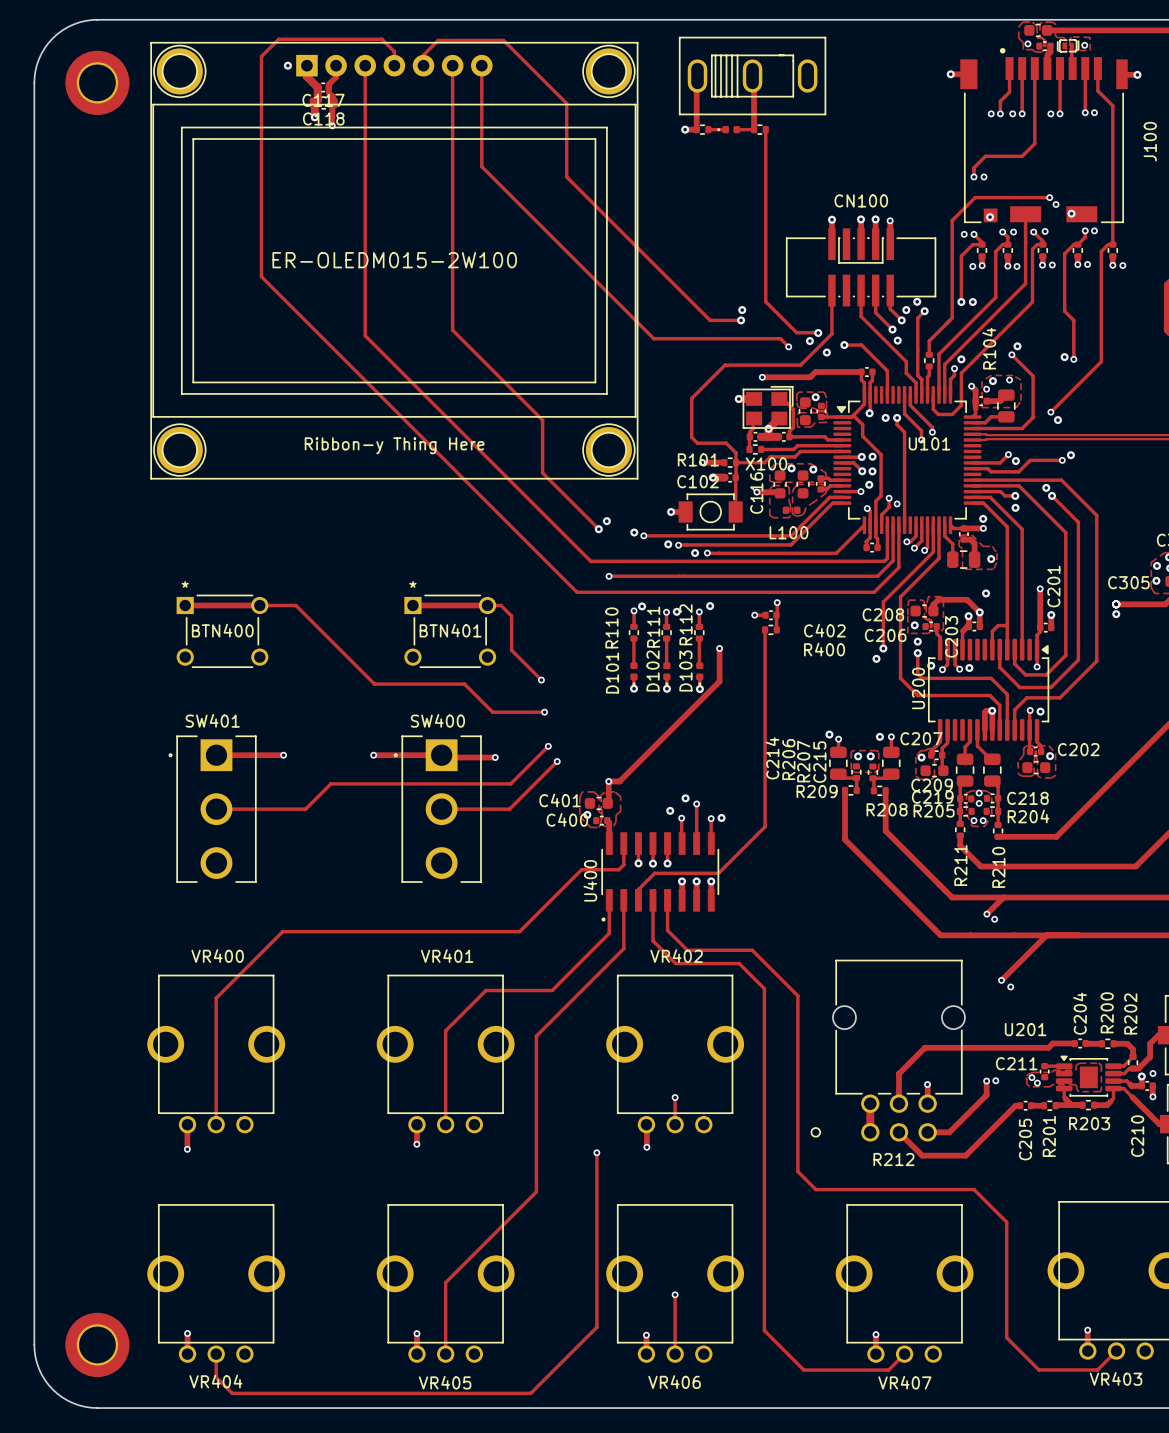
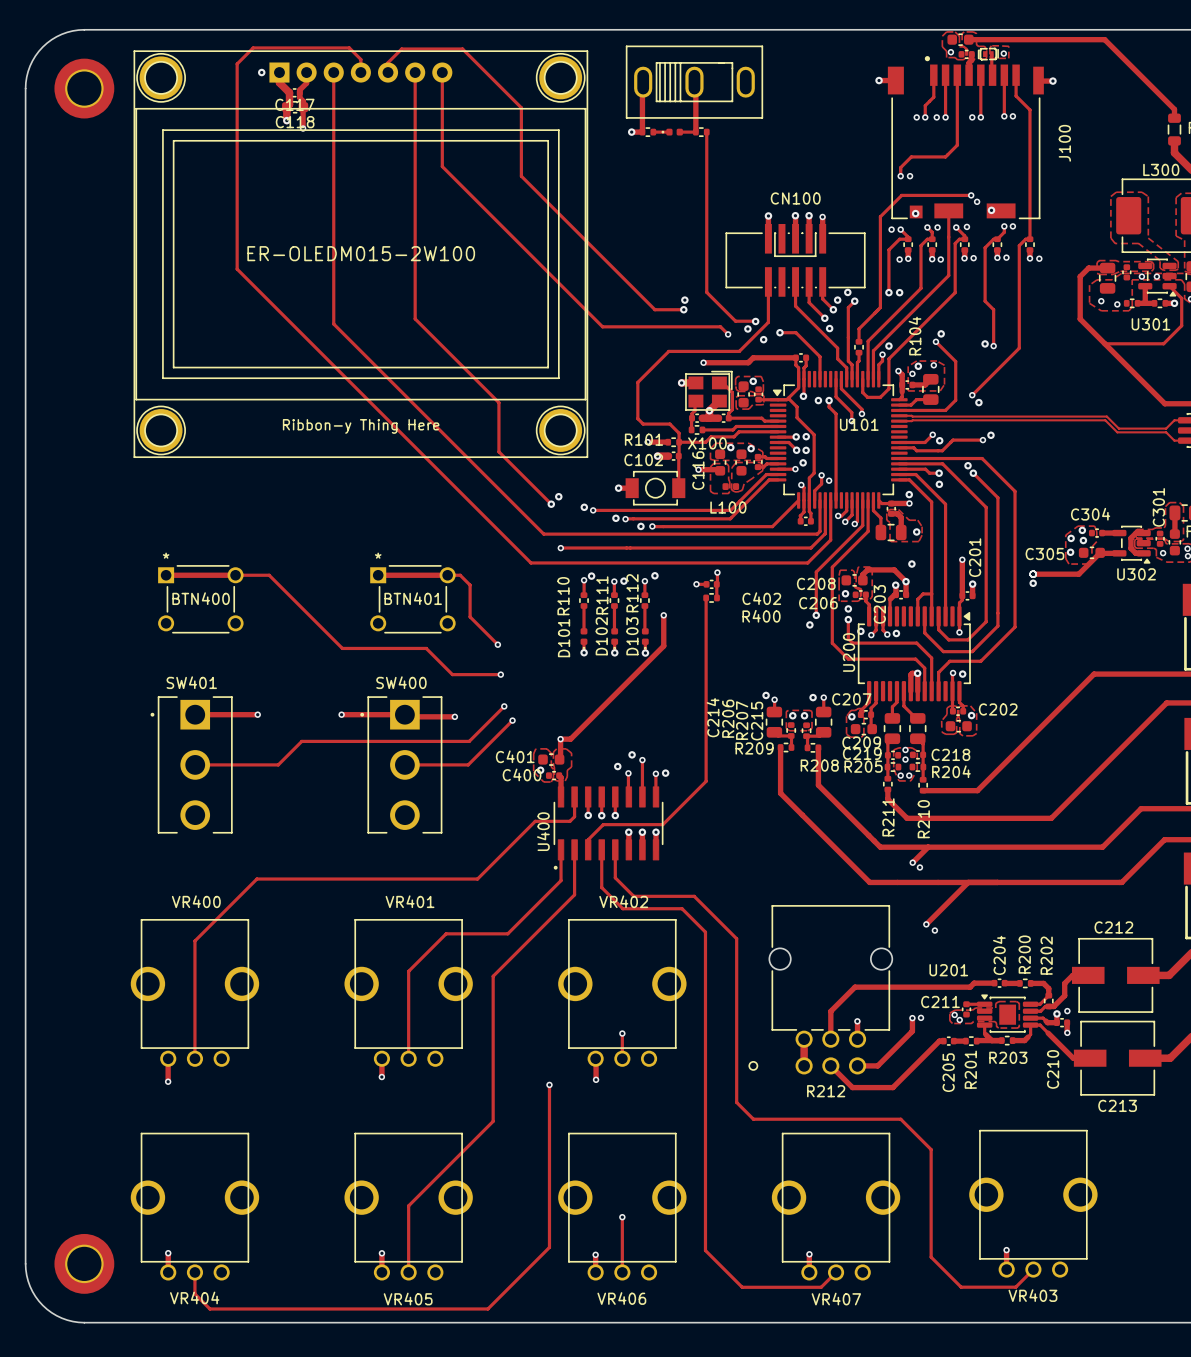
ER-OLEDM015-2W100 footprint: [150, 41, 639, 480] -> [133, 50, 589, 458]

